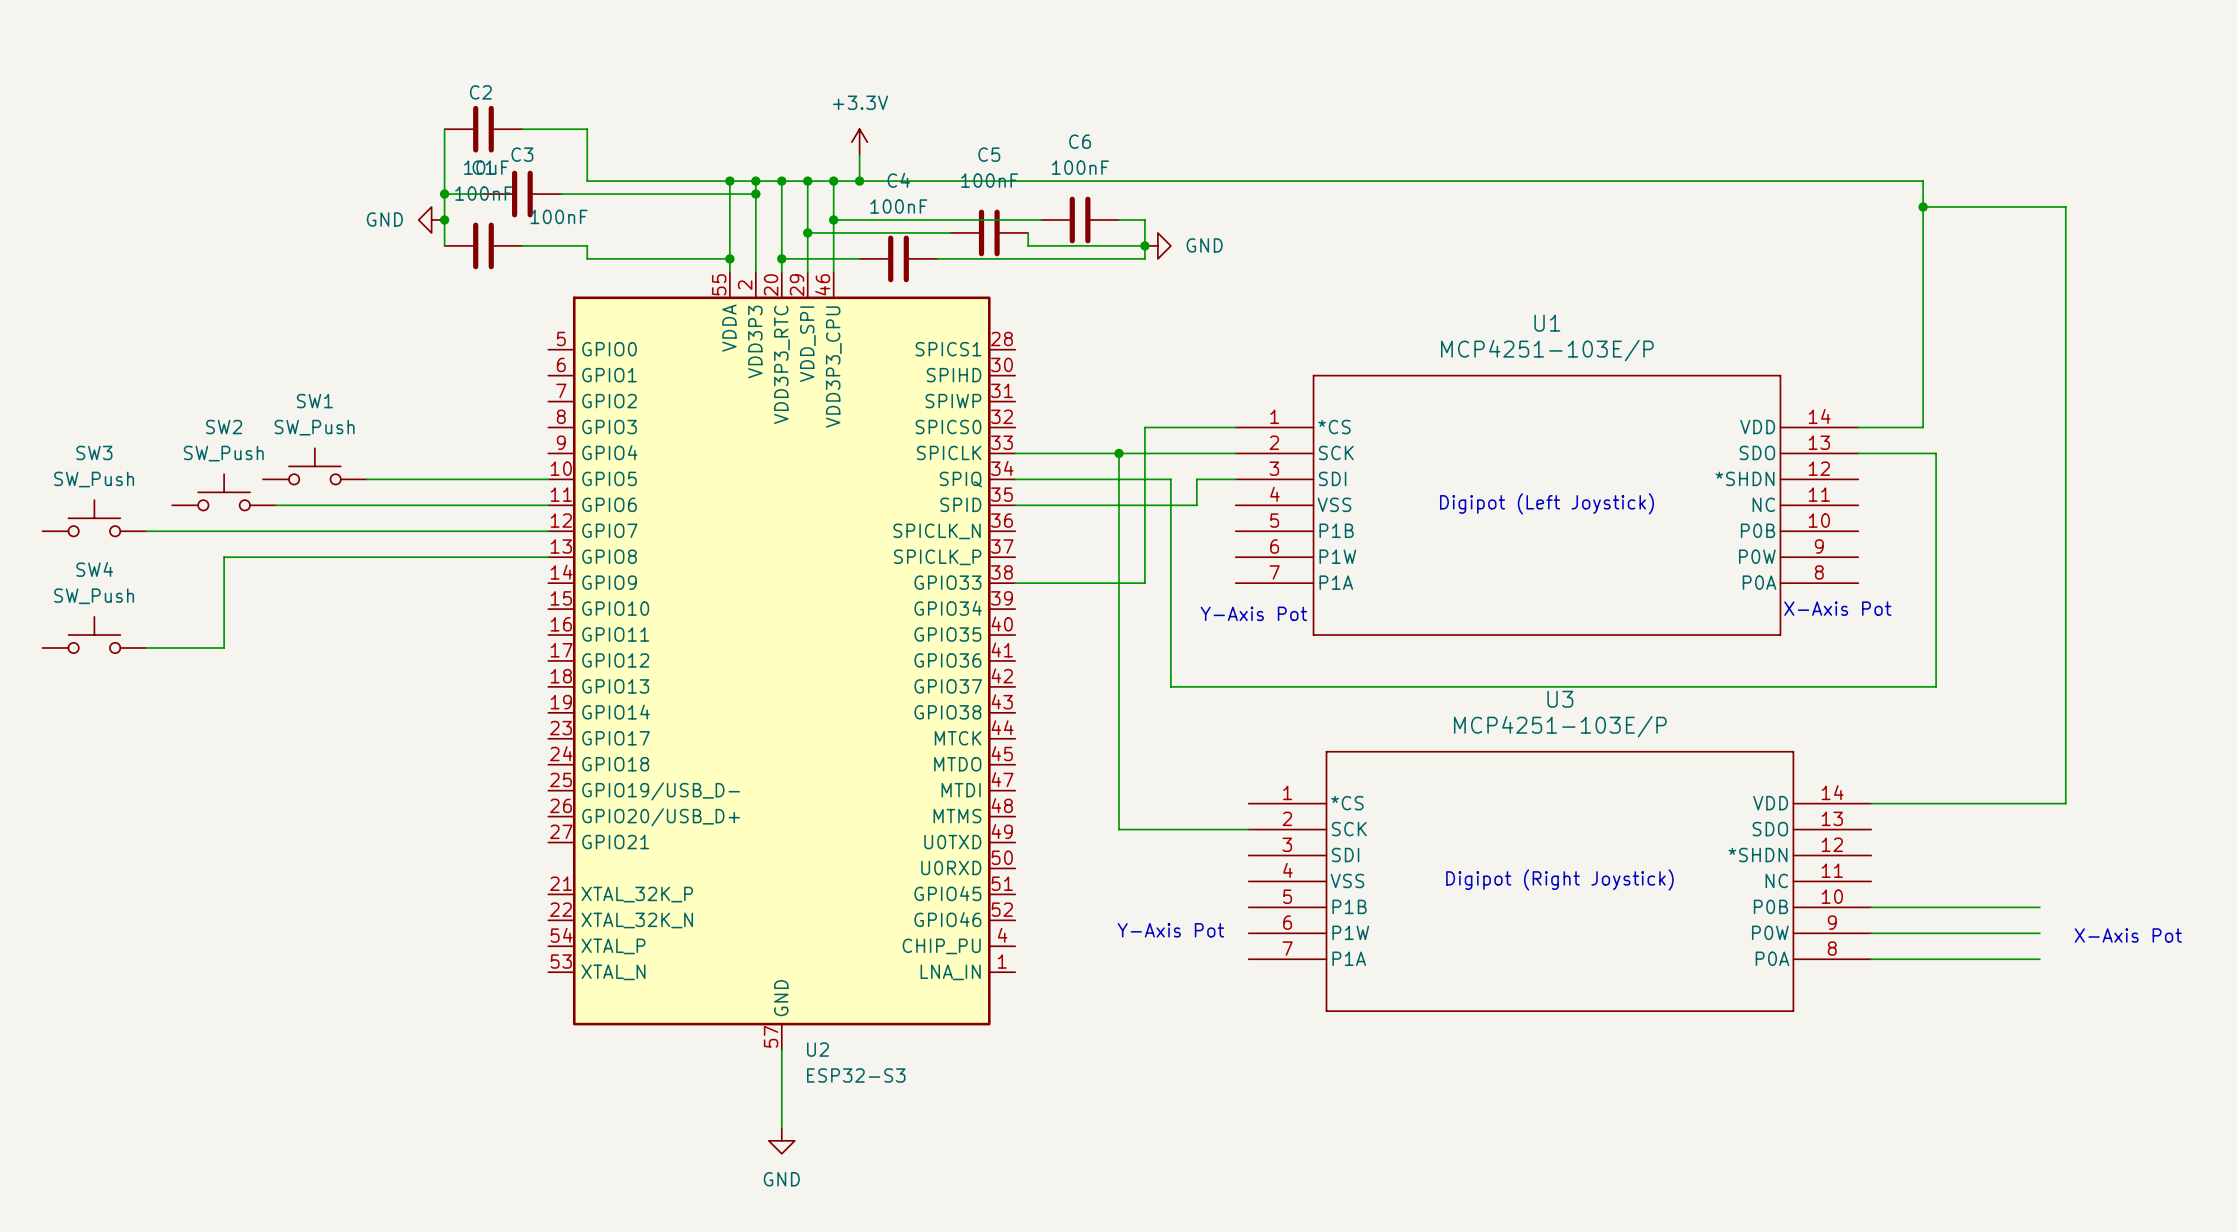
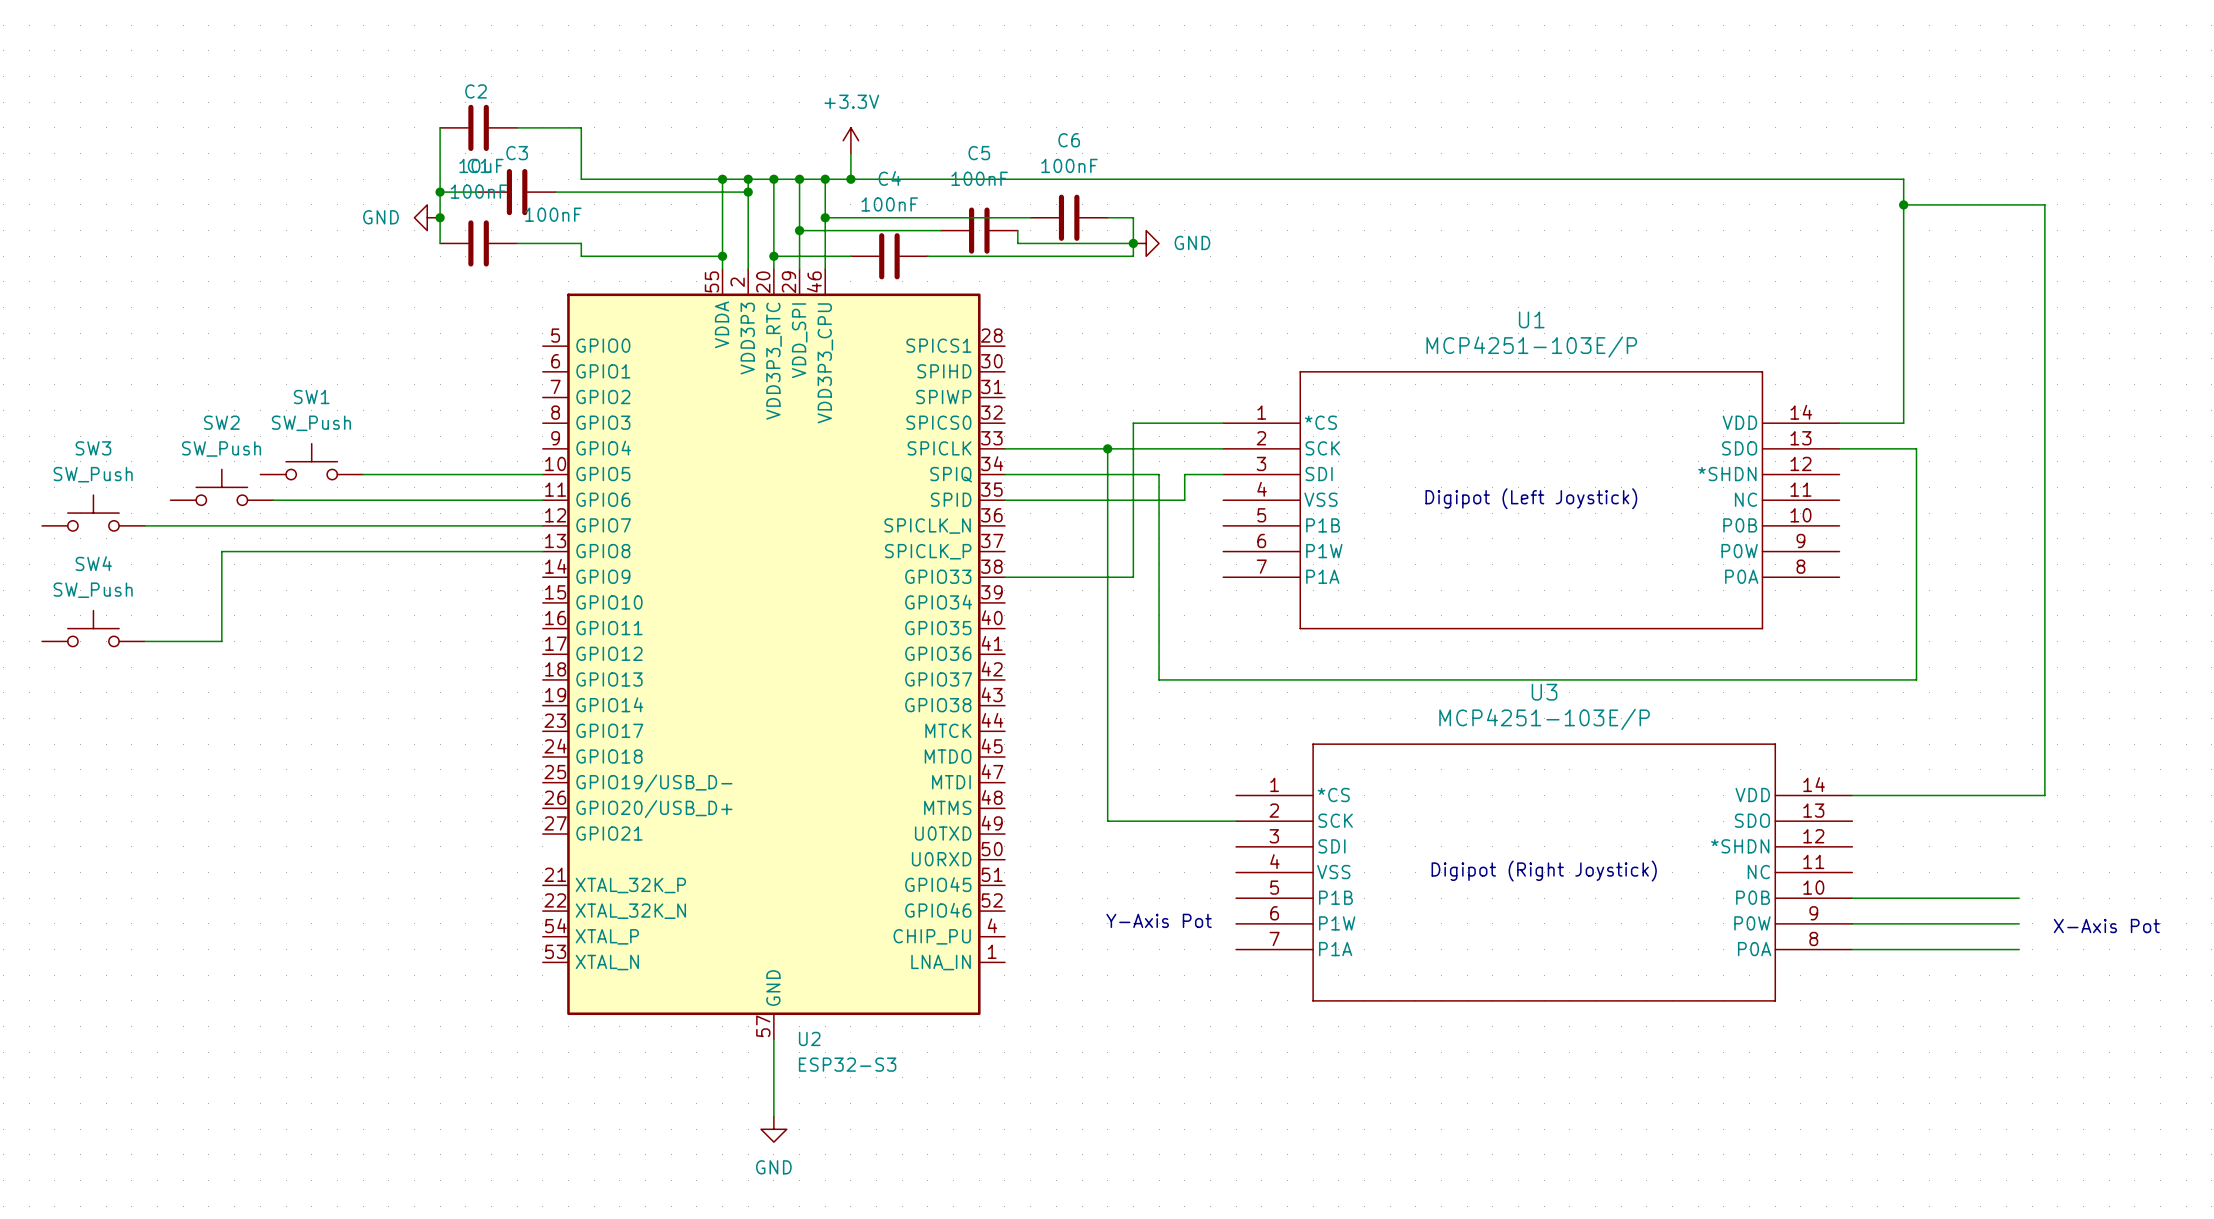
text: X-Axis Pot (1837, 608) -> none
text: Y-Axis Pot (1253, 613) -> none

